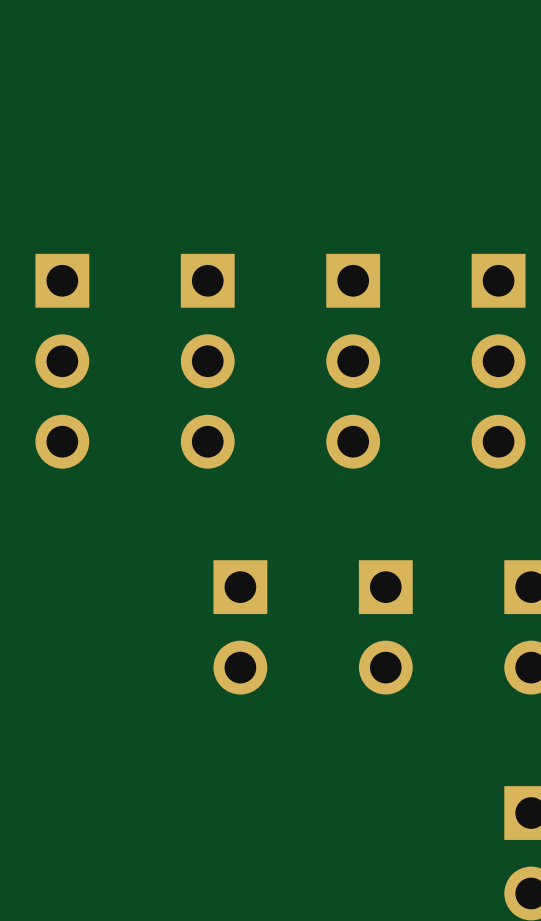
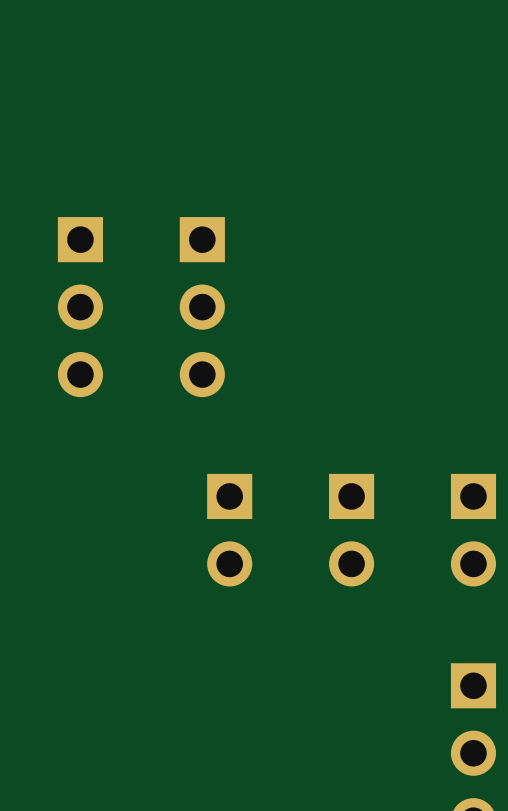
part: (353, 361) -> none
part: (498, 361) -> none

